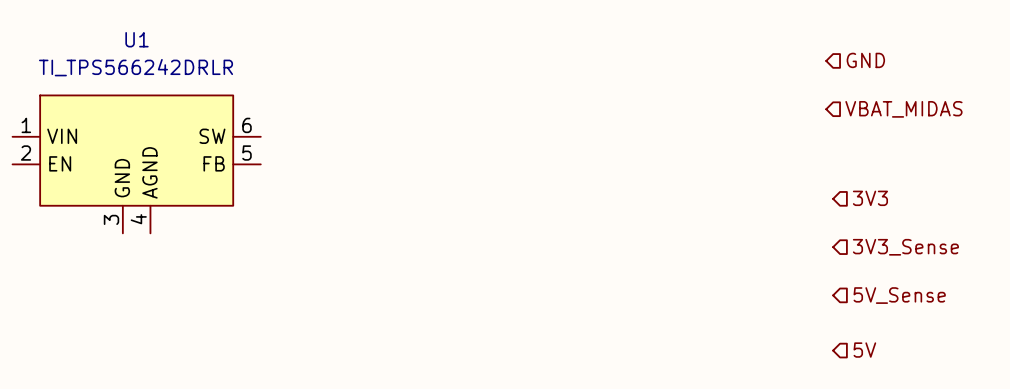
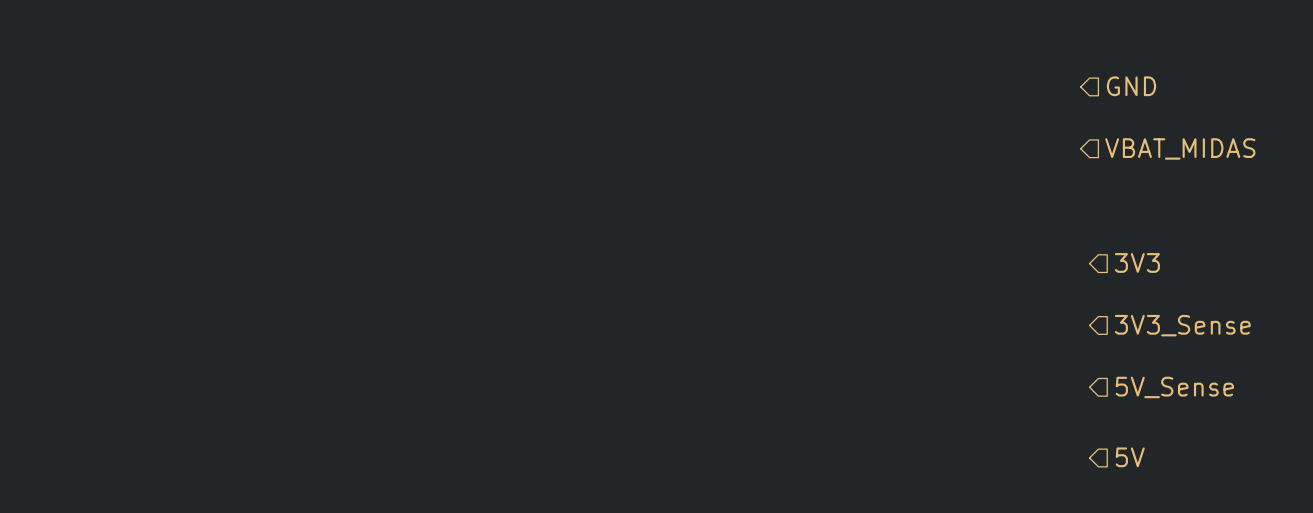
U1: TI_TPS566242DRLR (136, 164) -> none

